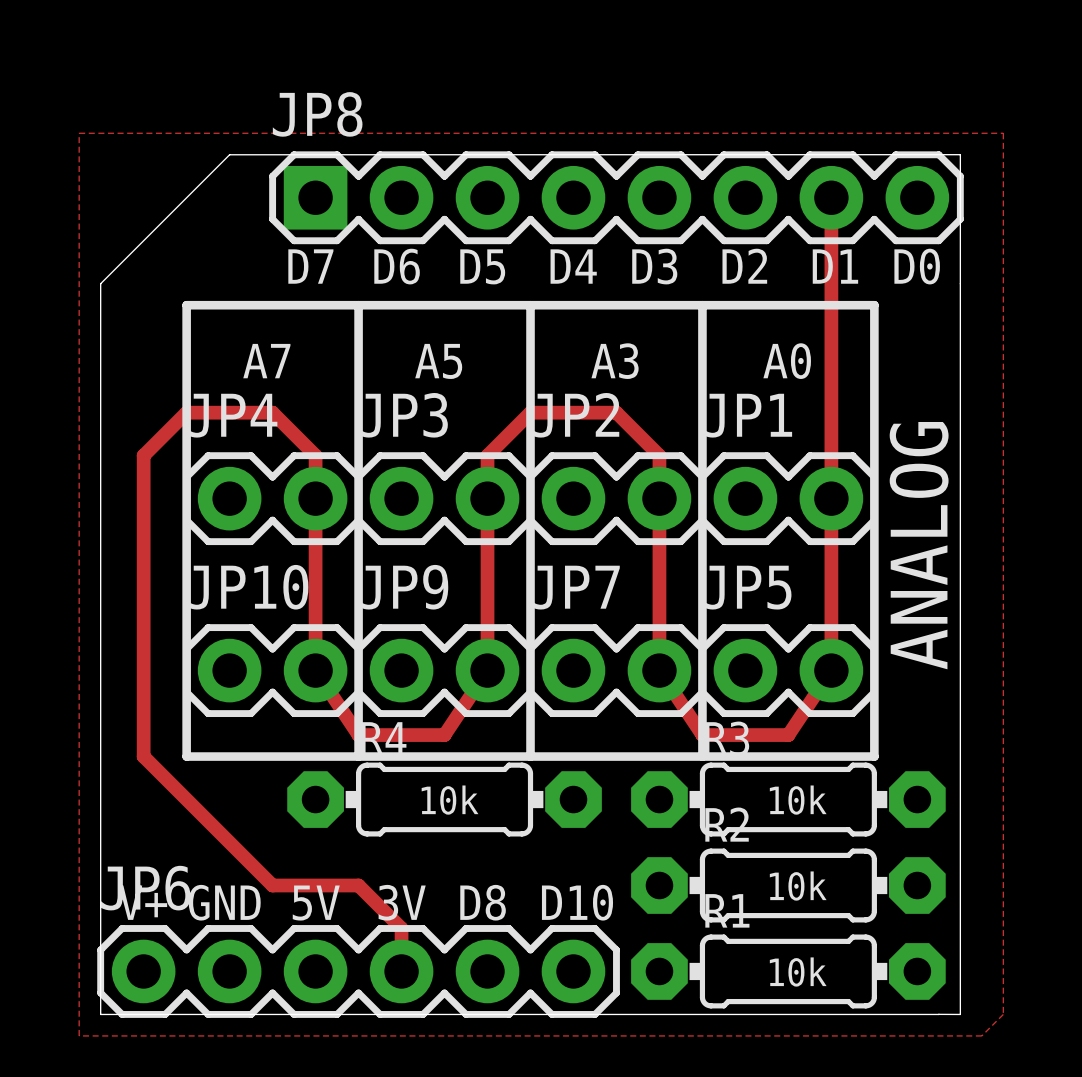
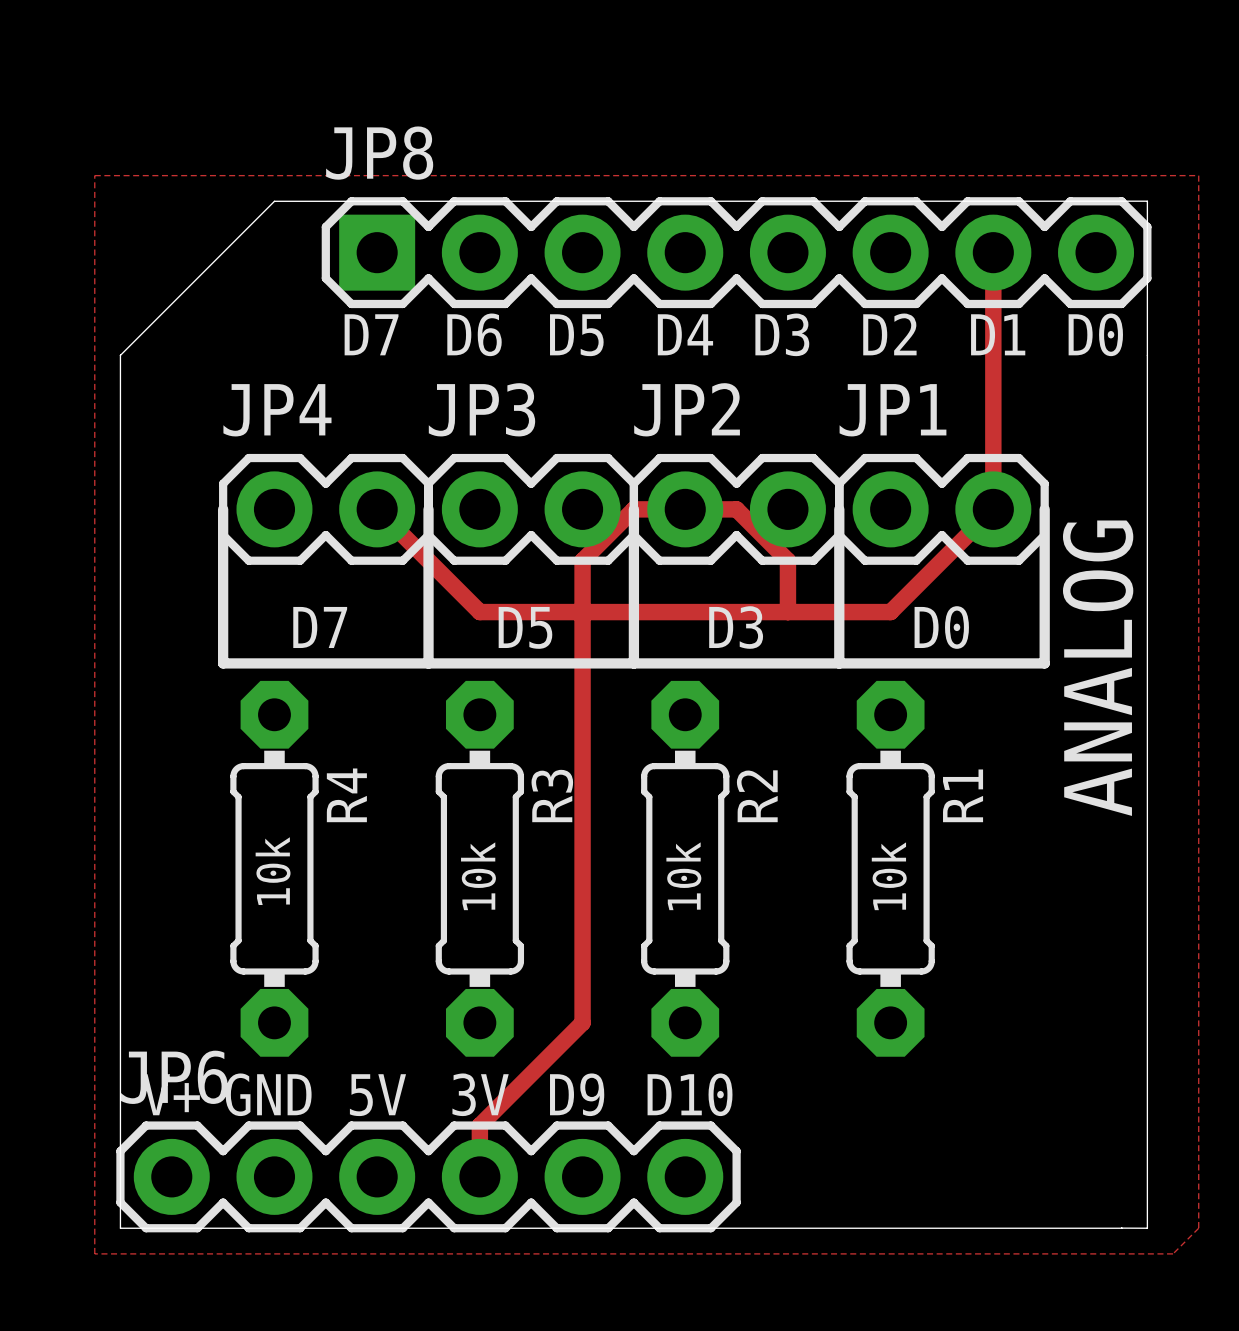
line: (358, 305) (358, 412) -> none
line: (530, 305) (530, 412) -> none
line: (702, 305) (702, 412) -> none
text: A7 (266, 361) -> none
text: A5 (438, 361) -> none
text: A3 (615, 361) -> none
text: A0 (787, 361) -> none
line: (186, 412) (186, 305) (874, 305) (874, 412) -> none
track: (831, 412) (831, 670) (788, 735) (702, 735) (659, 670) (659, 498) -> (993, 509) (890, 612) (479, 612) (377, 509)
JP4 position: (272, 498) -> (325, 509)
JP3 position: (444, 498) -> (531, 509)
JP2 position: (616, 498) -> (736, 509)
JP1 position: (788, 498) -> (941, 509)
text: none -> D7 (320, 627)
text: none -> D5 (525, 627)
text: none -> D3 (736, 627)
text: none -> D0 (941, 627)
line: (186, 541) (186, 756) (874, 756) (874, 541) -> (223, 663) (1044, 663)
line: (358, 541) (358, 756) -> none
line: (530, 541) (530, 756) -> none
line: (702, 541) (702, 756) -> none
JP10: (272, 670) -> none
JP9: (444, 670) -> none
track: (487, 670) (444, 735) (358, 735) (315, 670) (315, 455) (272, 412) (186, 412) (143, 455) (143, 756) (272, 885) (358, 885) (401, 928) -> (582, 817) (582, 1022) (479, 1125)
JP7: (616, 670) -> none
JP5: (788, 670) -> none
text: none -> 10k (273, 871)
text: none -> 10k (478, 876)
text: none -> 10k (683, 876)
text: none -> 10k (889, 876)
R4 rotation: 0° (444, 799) -> 90° clockwise (274, 868)
R4 position: (444, 799) -> (274, 868)
R3 rotation: 0° (788, 799) -> 90° clockwise (479, 868)
R3 position: (788, 799) -> (479, 868)
text: 10k (450, 800) -> none
text: 10k (798, 800) -> none
R2 rotation: 0° (788, 885) -> 90° clockwise (685, 868)
R2 position: (788, 885) -> (685, 868)
text: 10k (798, 886) -> none
text: D8 (483, 902) -> D9 (577, 1094)
R1 rotation: 0° (788, 971) -> 90° clockwise (890, 868)
R1 position: (788, 971) -> (890, 868)
text: 10k (798, 972) -> none

